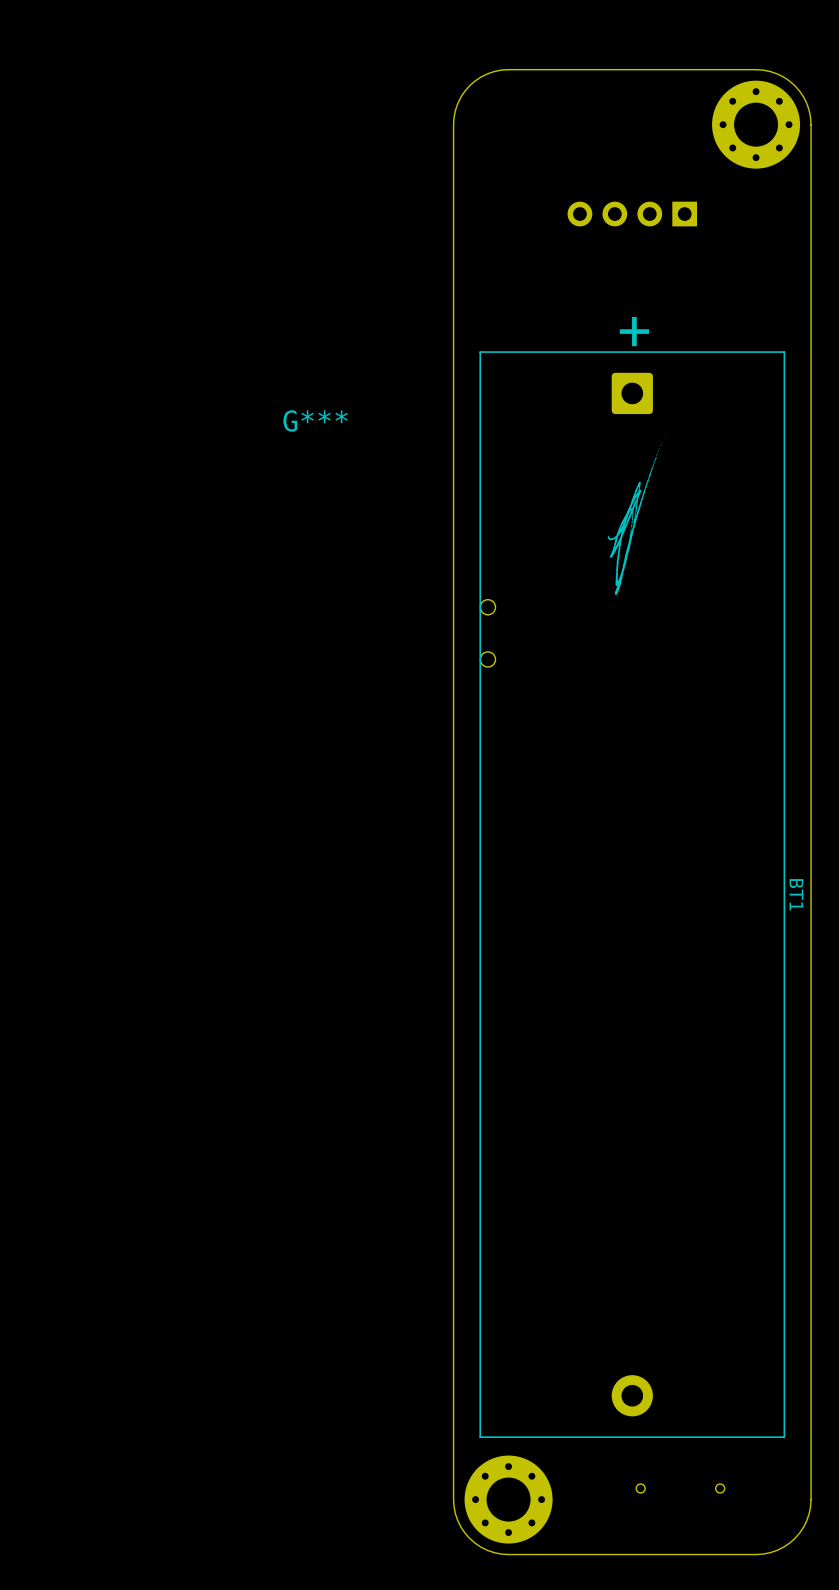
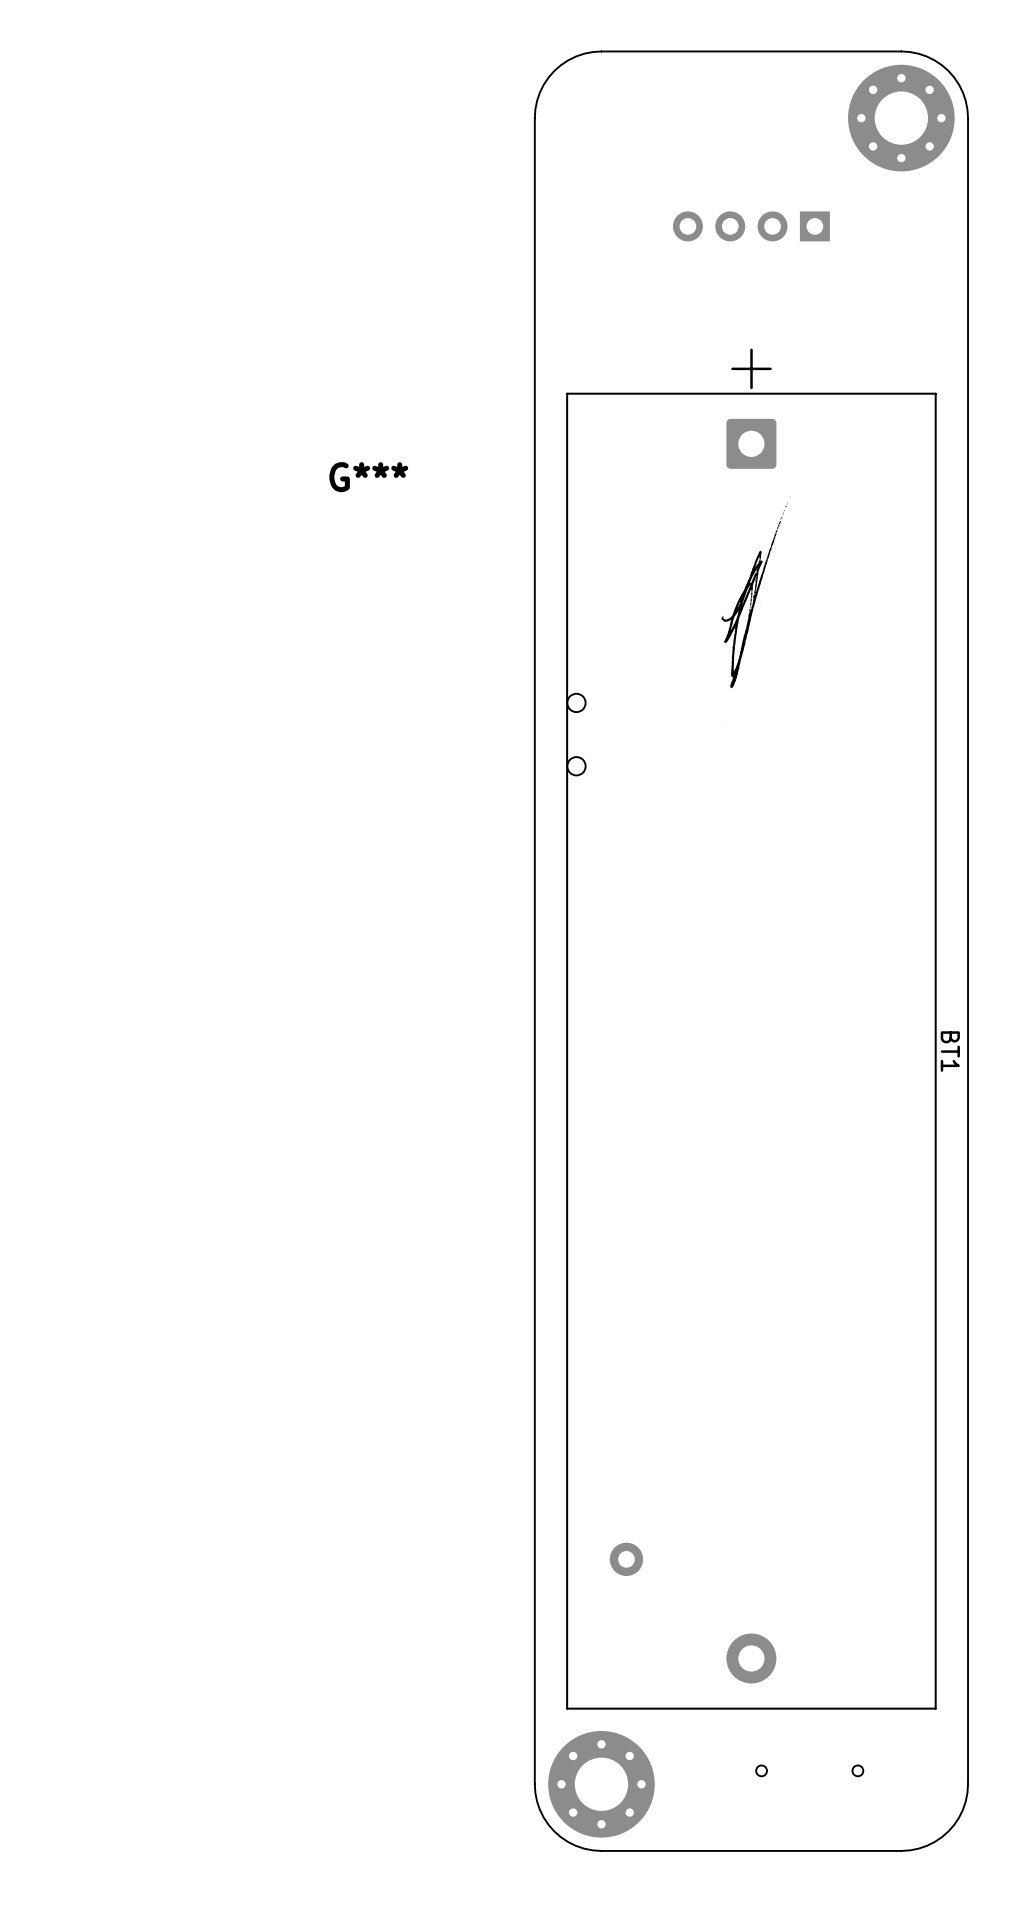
part: none -> (626, 1559)

